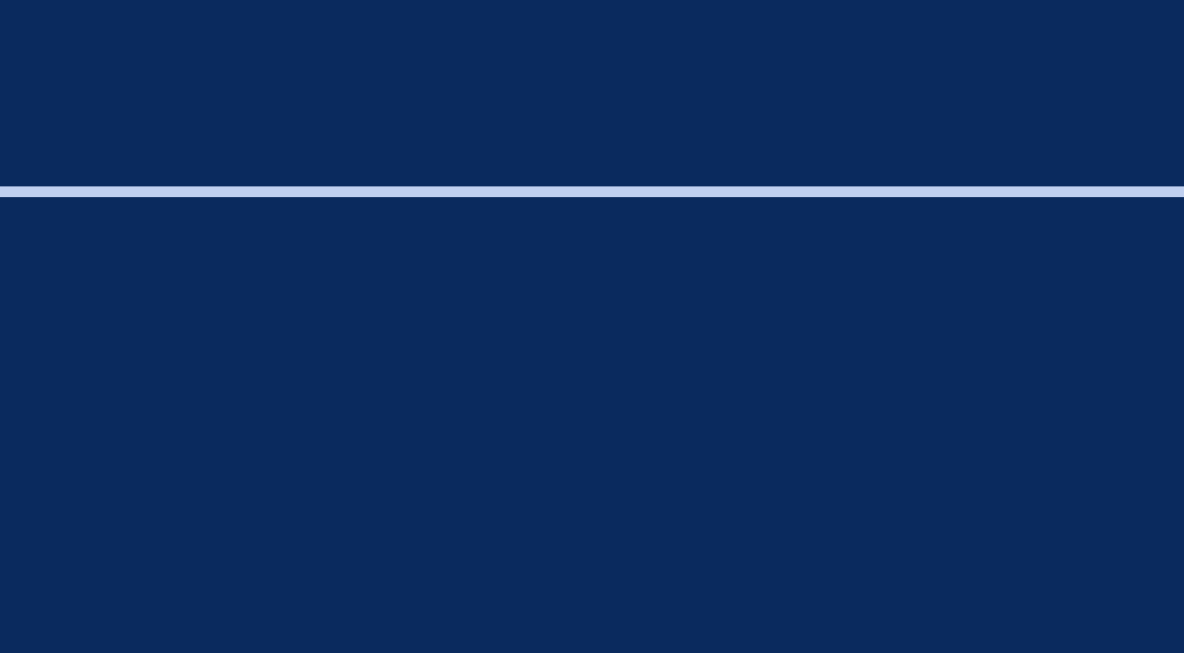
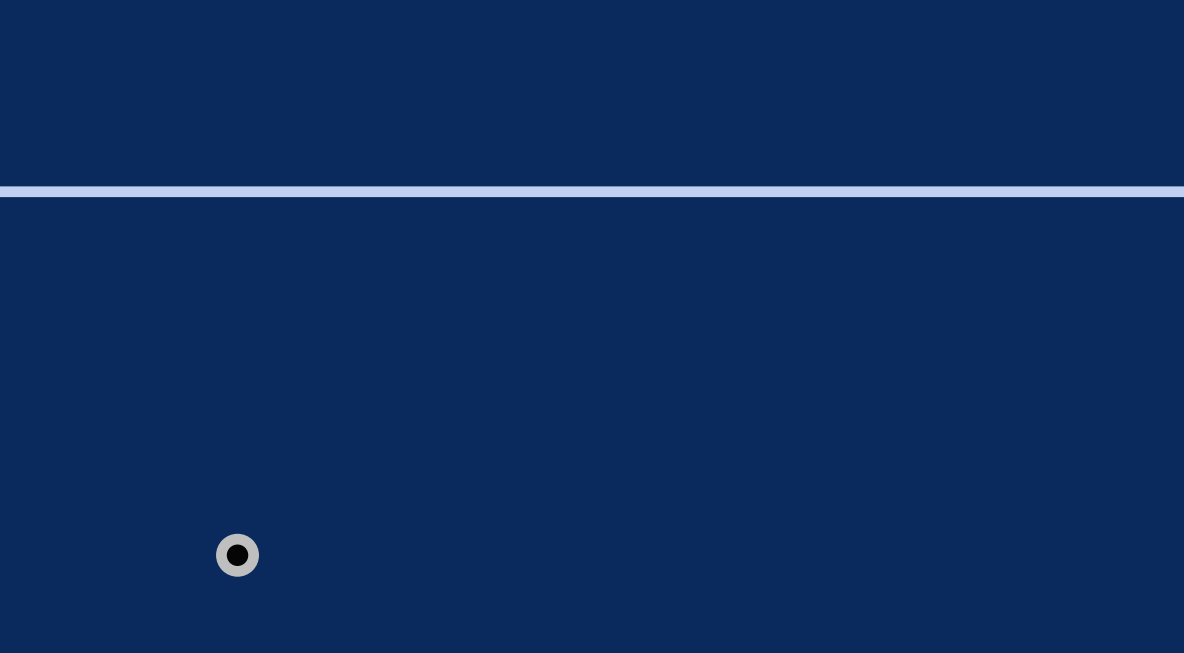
via: none -> (237, 555)

